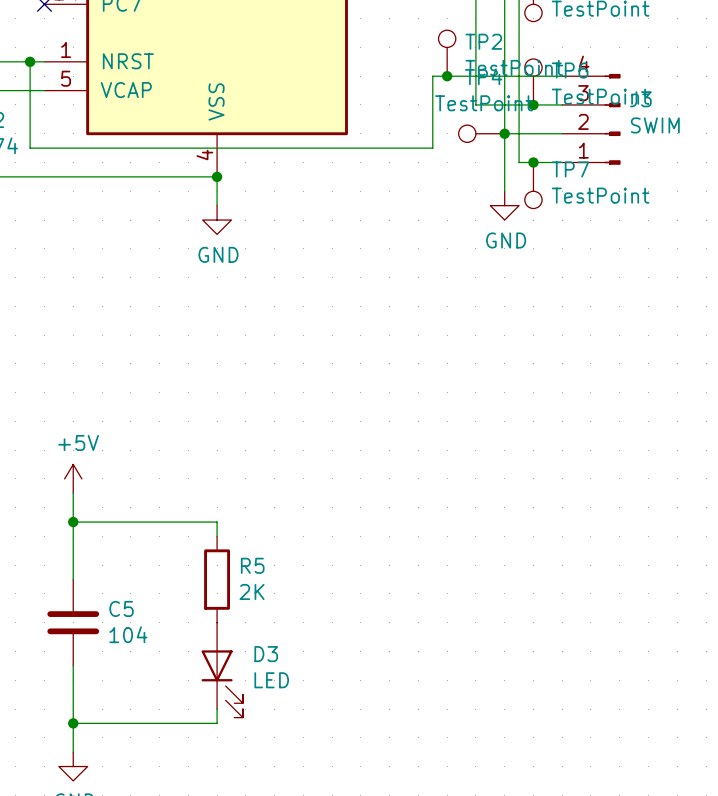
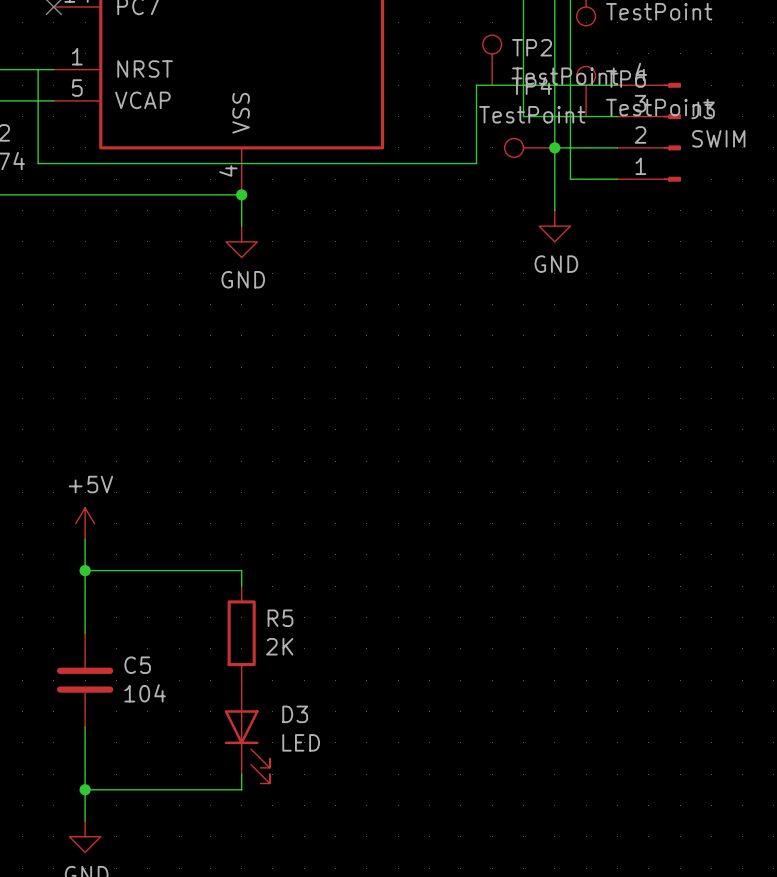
junction: (30, 61) -> none
junction: (447, 76) -> none
junction: (533, 104) -> none
junction: (533, 162) -> none
TP7: TestPoint (533, 185) -> none

